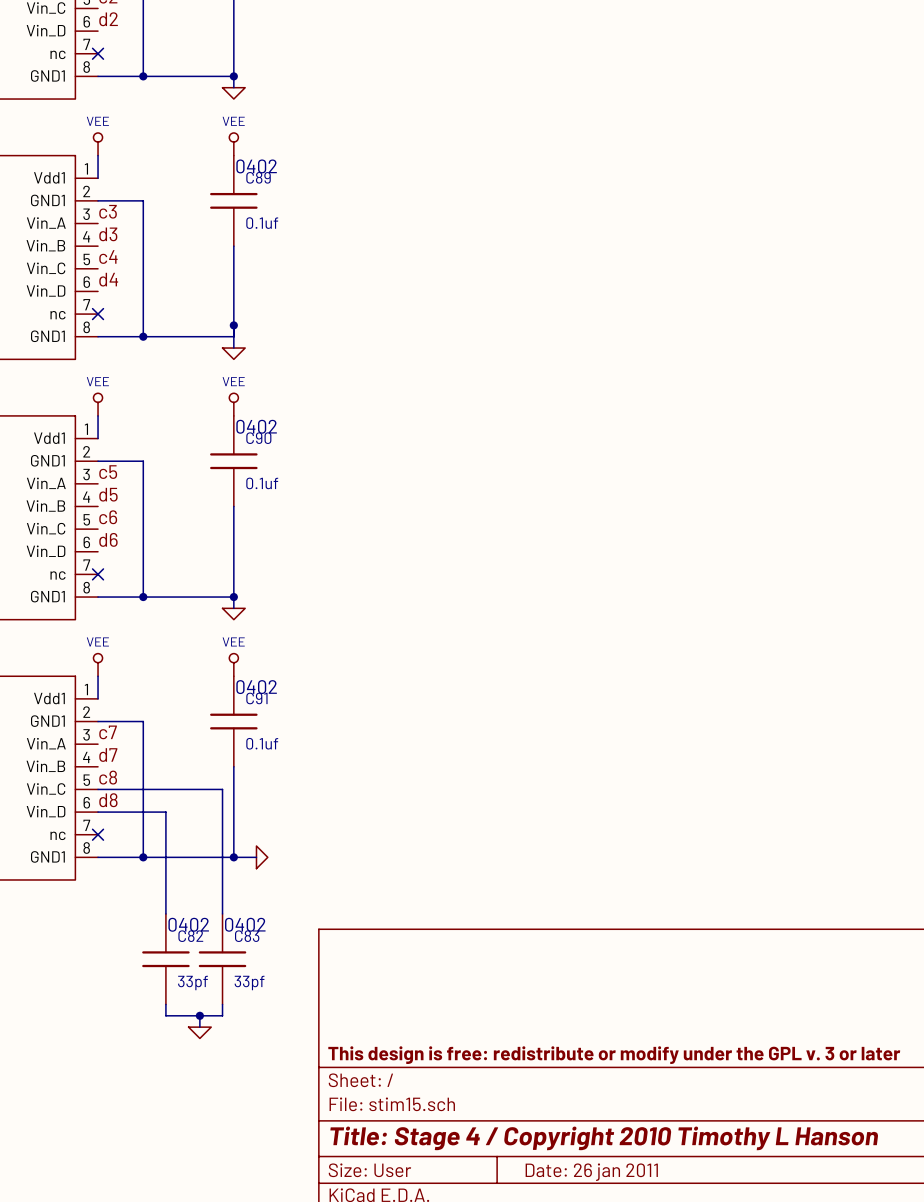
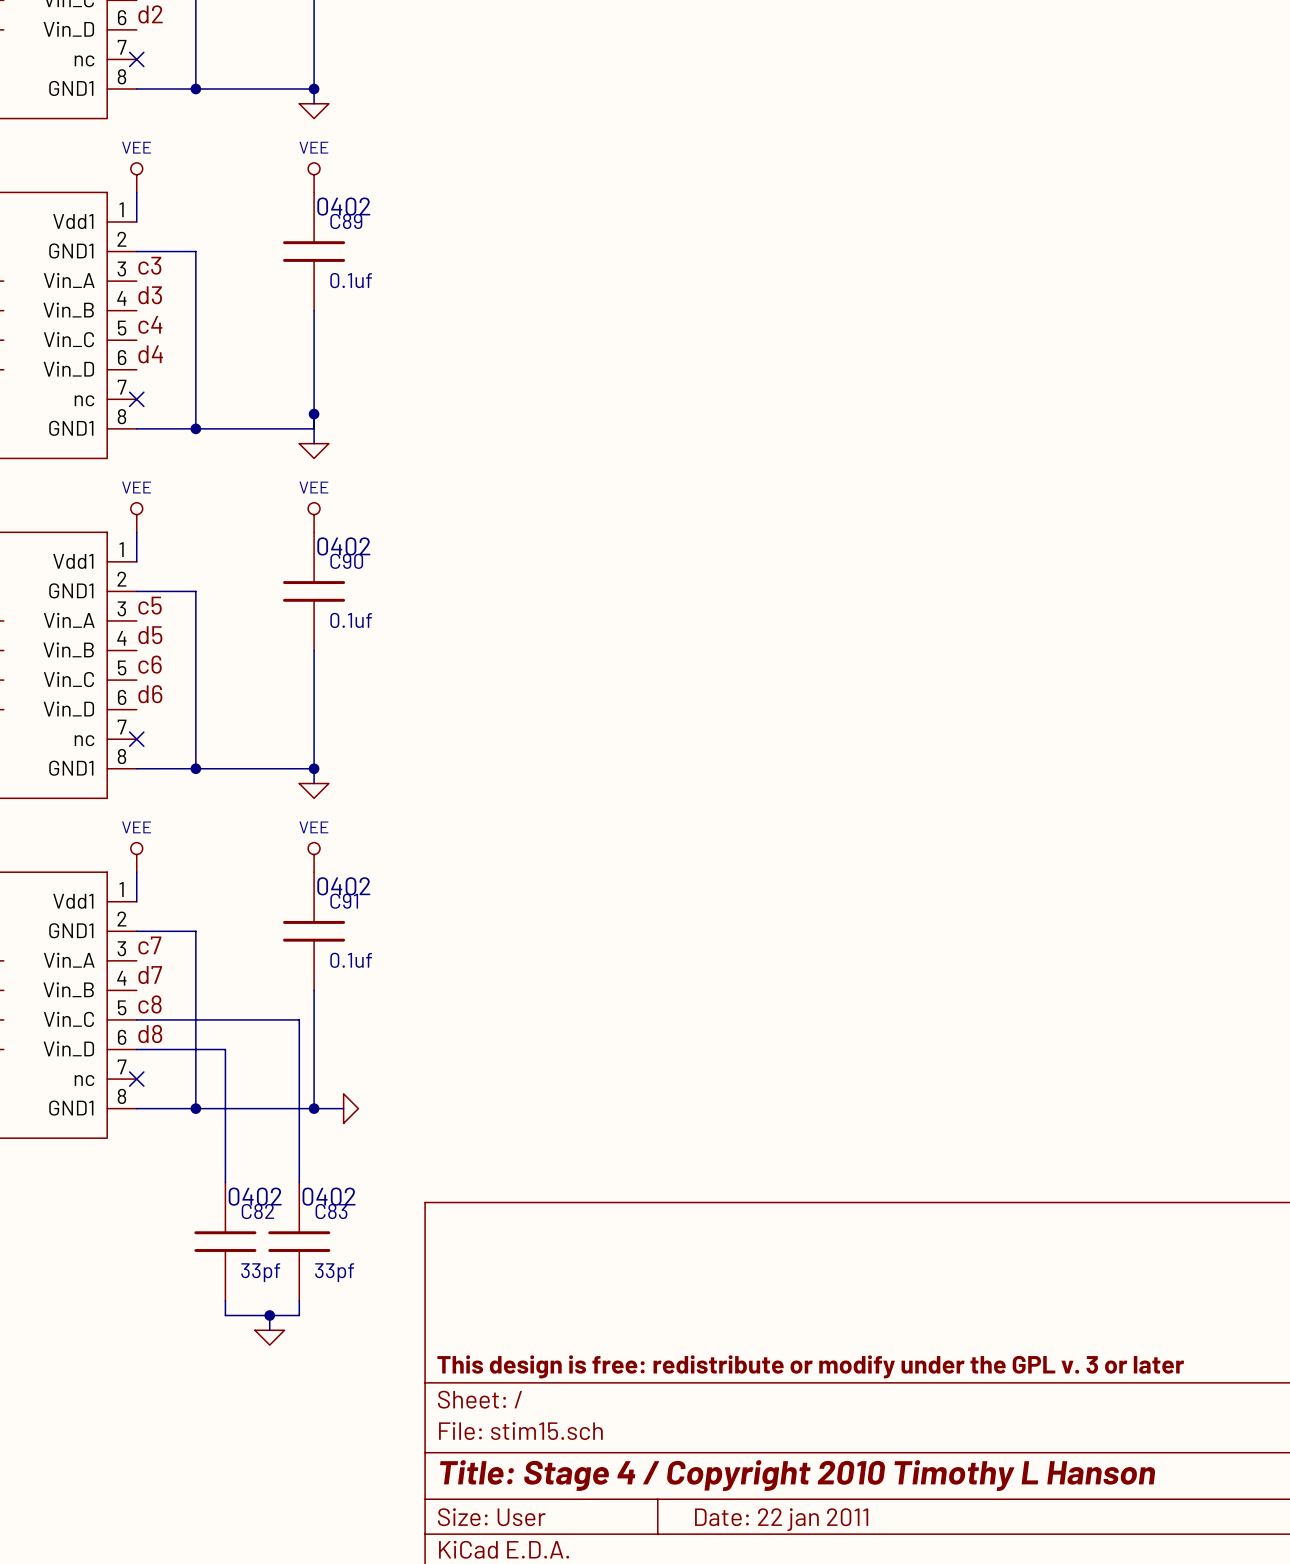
title block: Date: 26 jan 2011 (591, 1172) -> Date: 22 jan 2011 (781, 1519)

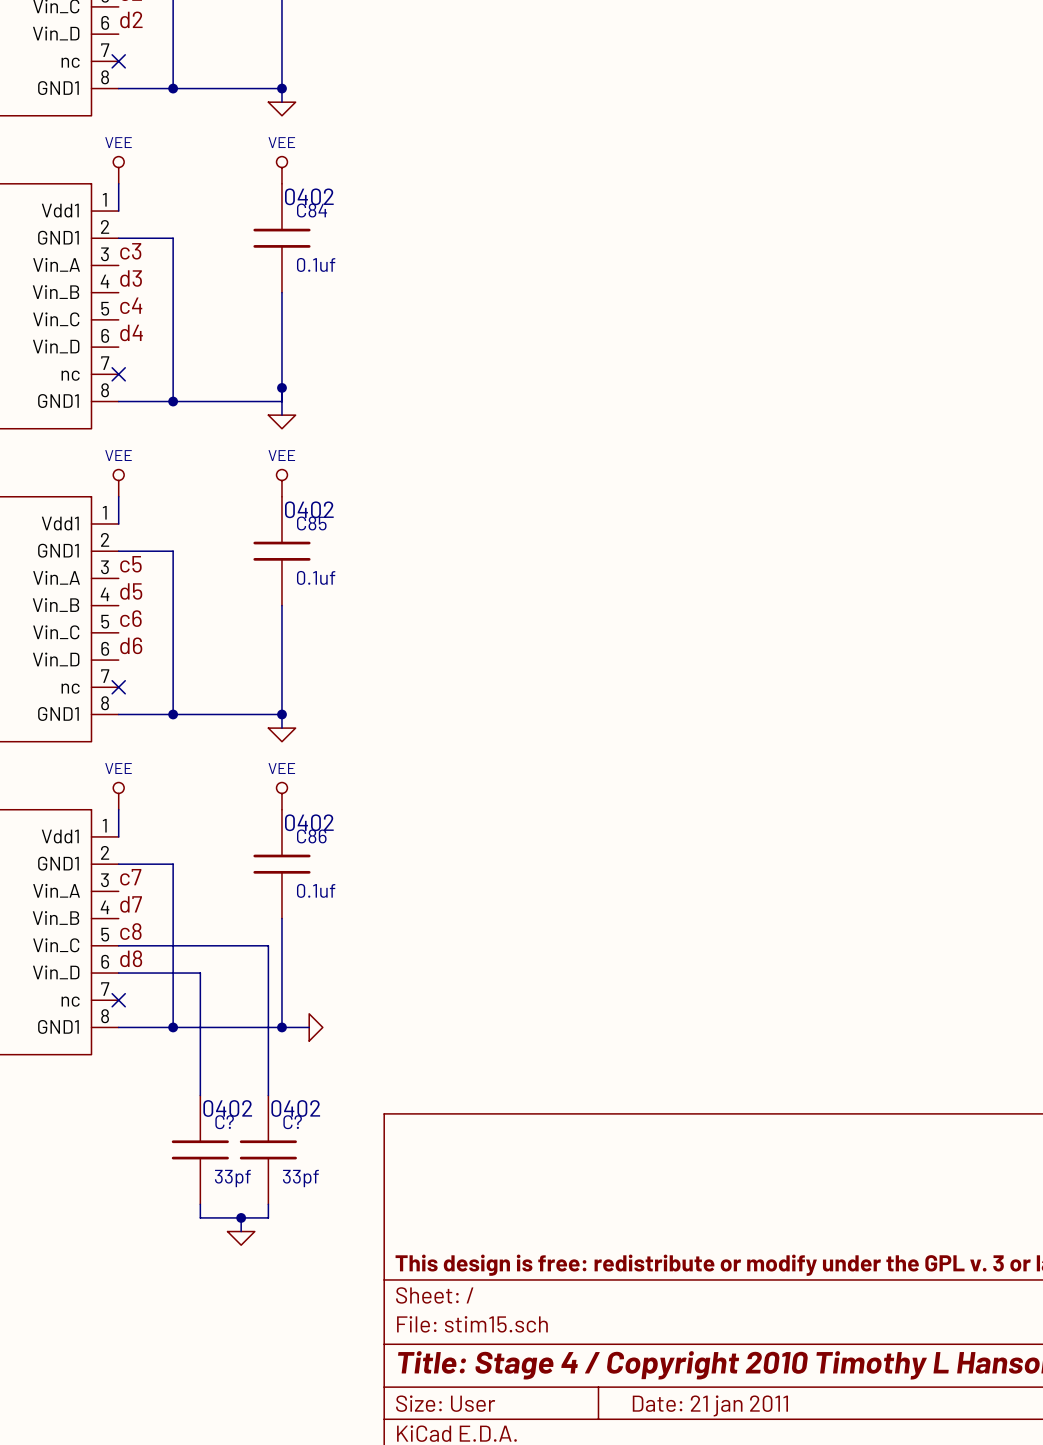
C89 name: C89 (346, 221) -> C84 (312, 210)
C90 name: C90 (346, 561) -> C85 (311, 523)
C91 name: C91 (344, 901) -> C86 (311, 836)
C82 name: C82 (257, 1211) -> C? (224, 1122)
C83 name: C83 (331, 1211) -> C? (292, 1122)
title block: Date: 22 jan 2011 (781, 1519) -> Date: 21 jan 2011 (710, 1405)

